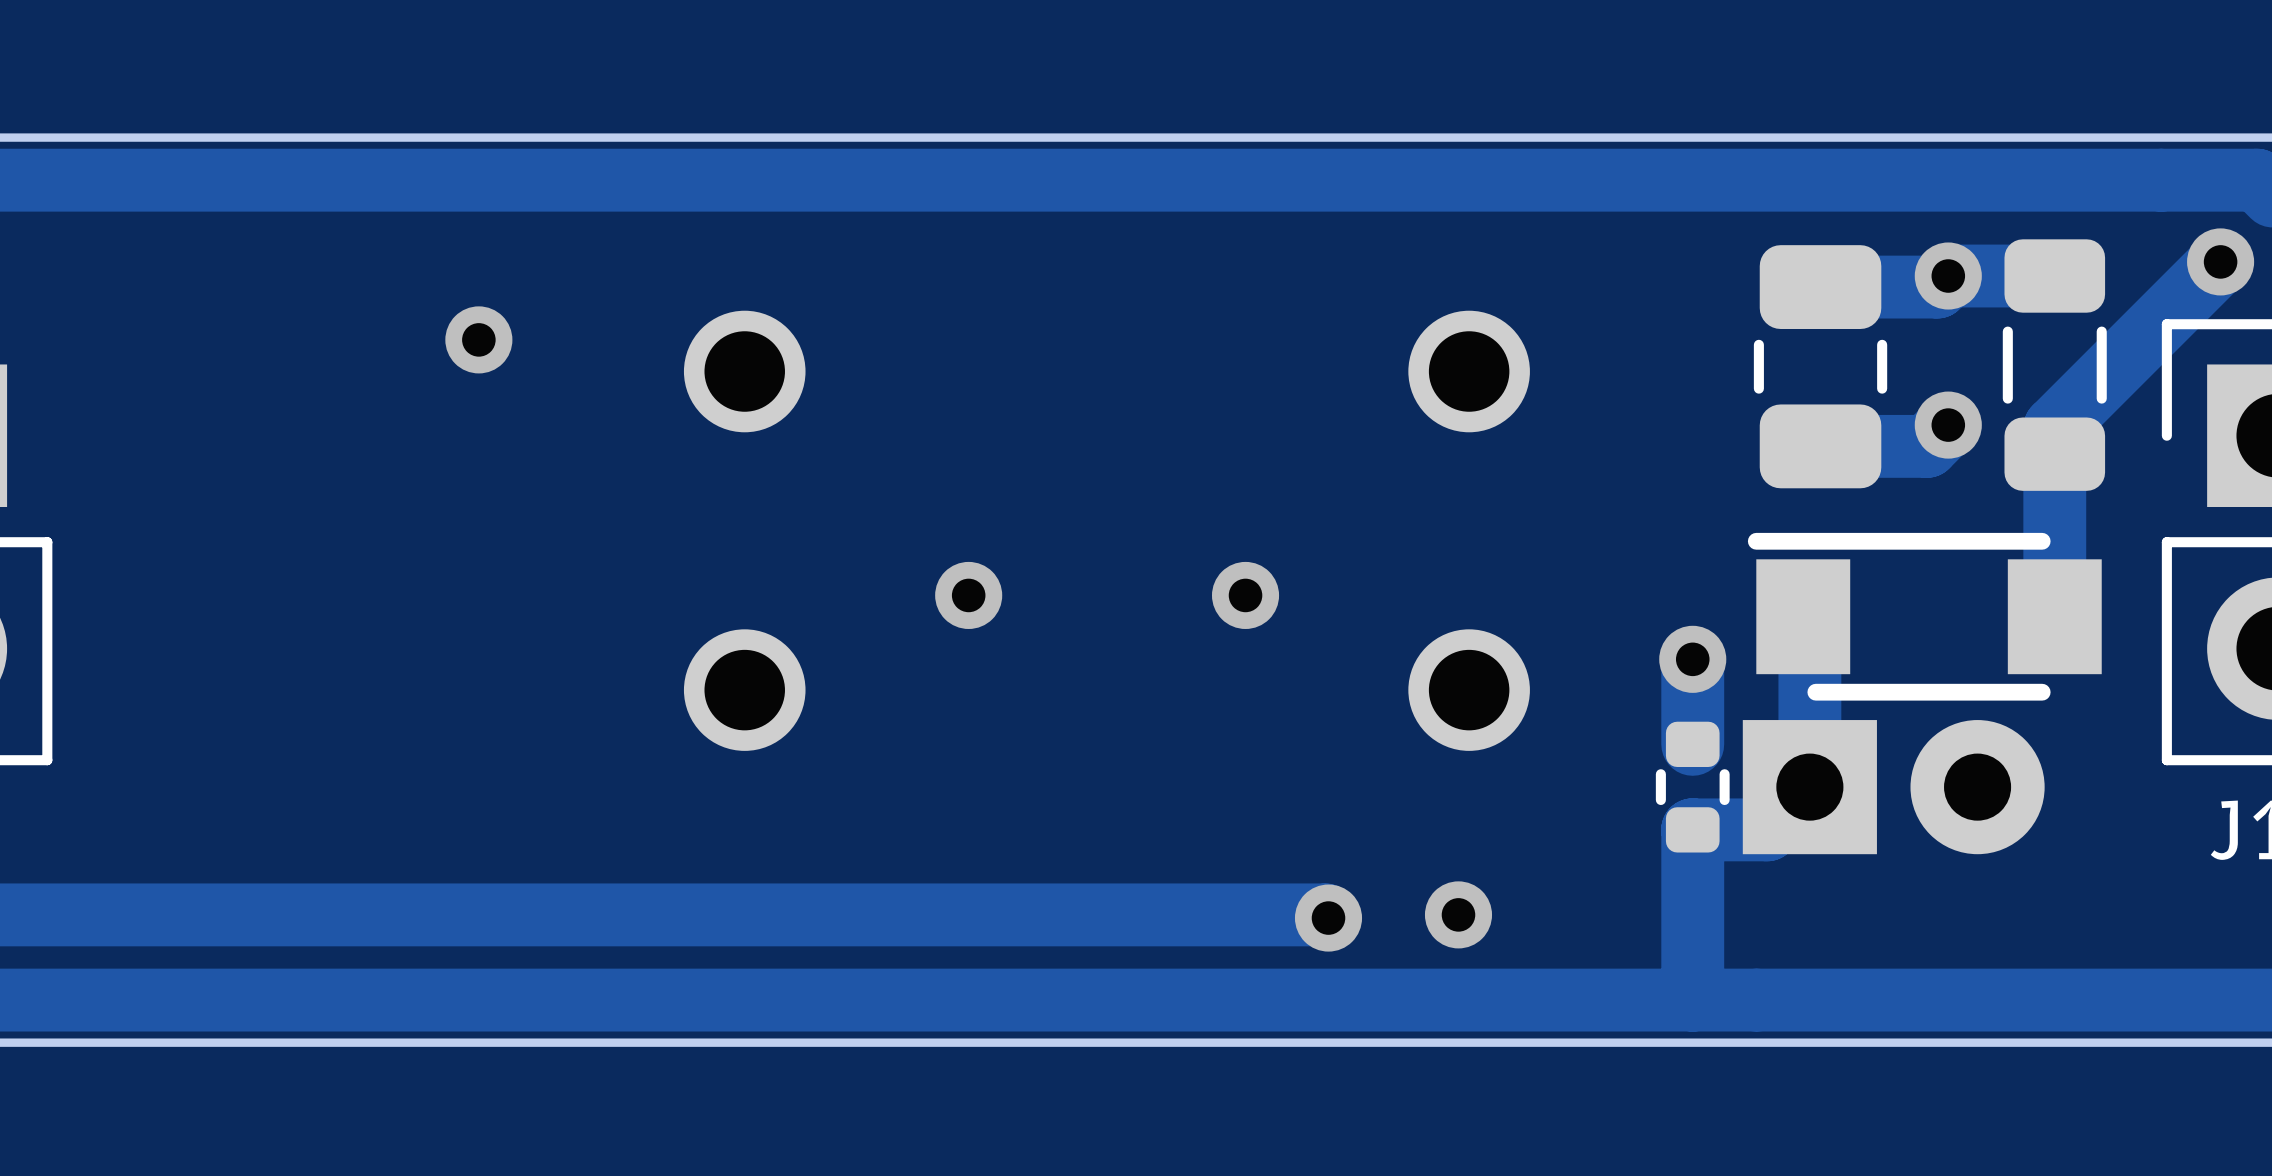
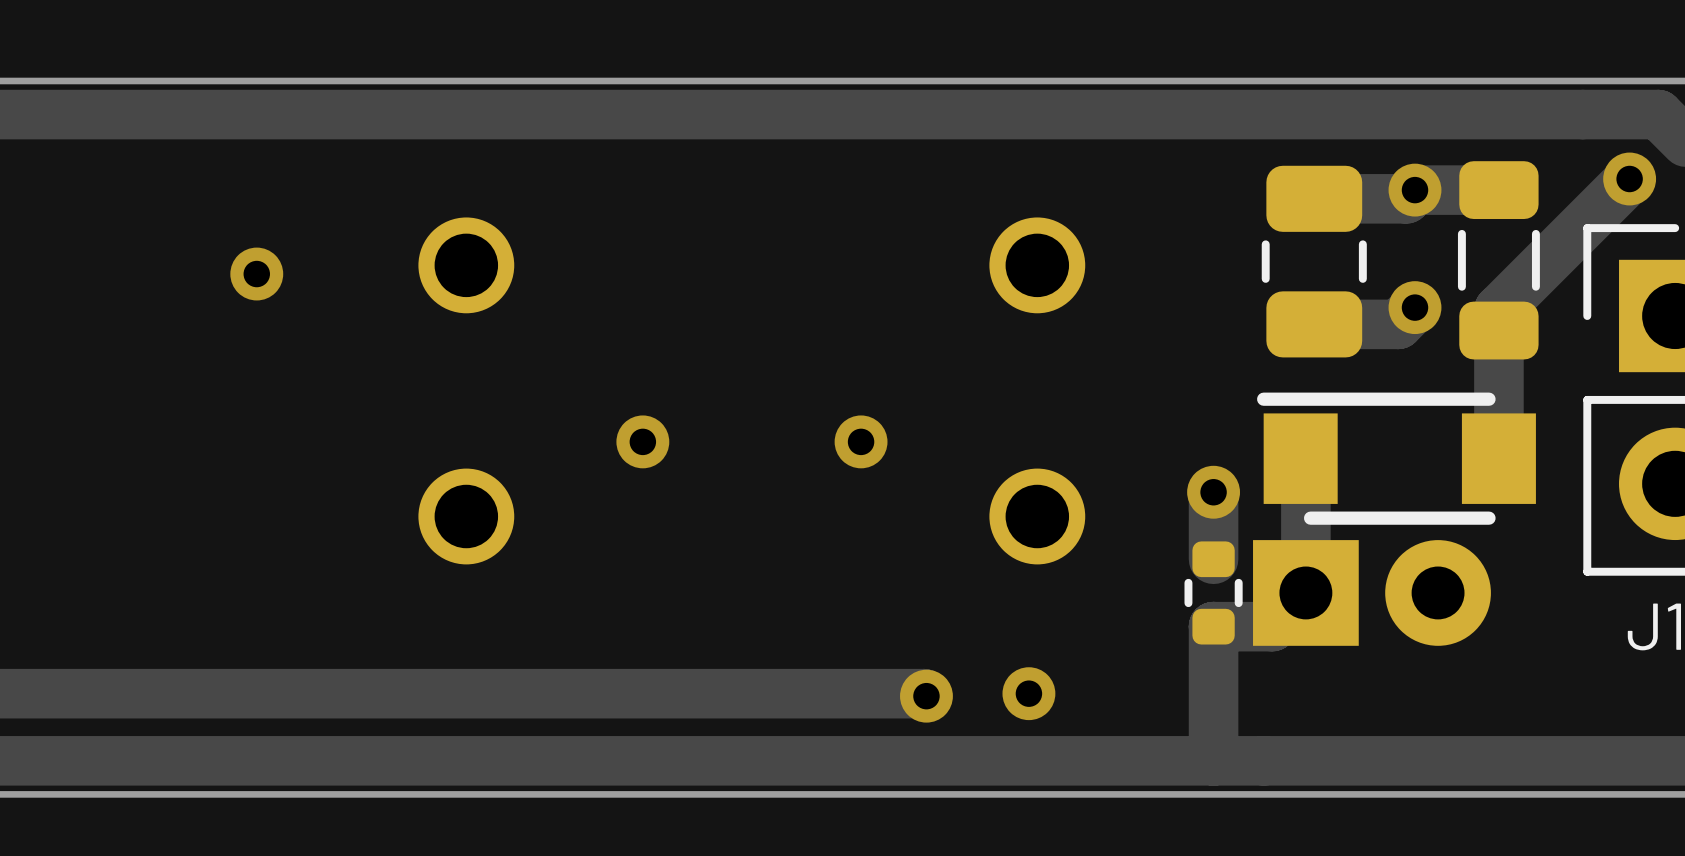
via position: (478, 339) -> (256, 274)

